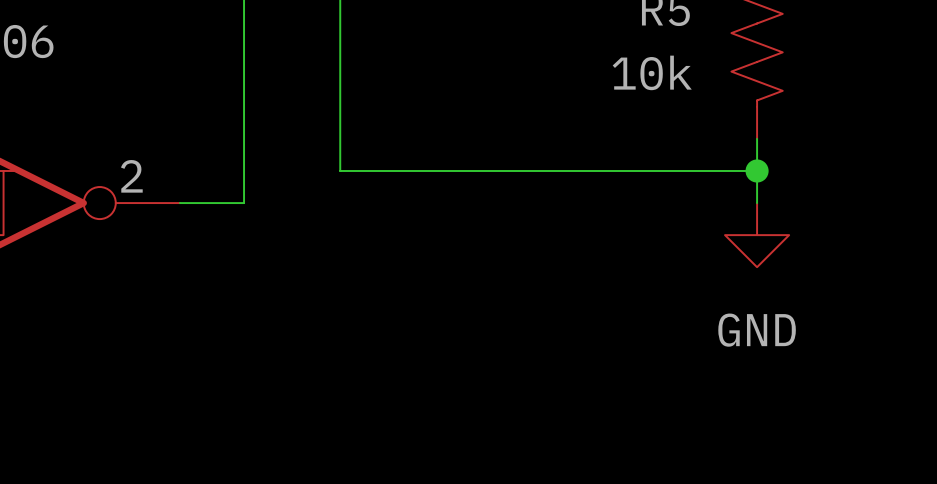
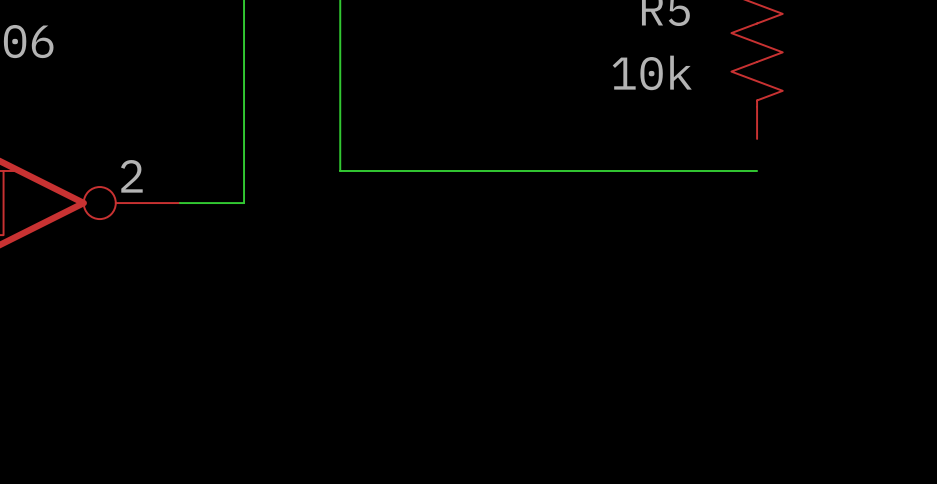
wire: (757, 138) (757, 203) -> none
junction: (757, 170) -> none
power symbol: GND (757, 235) -> none

